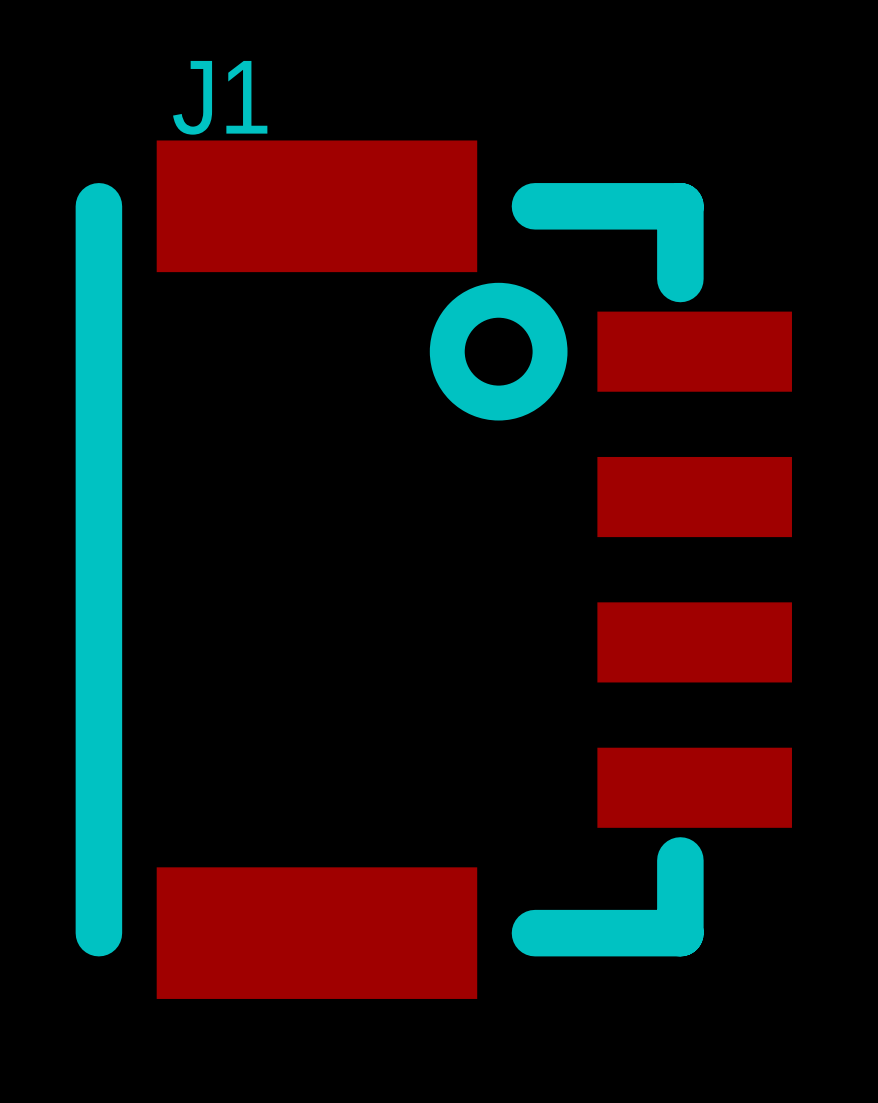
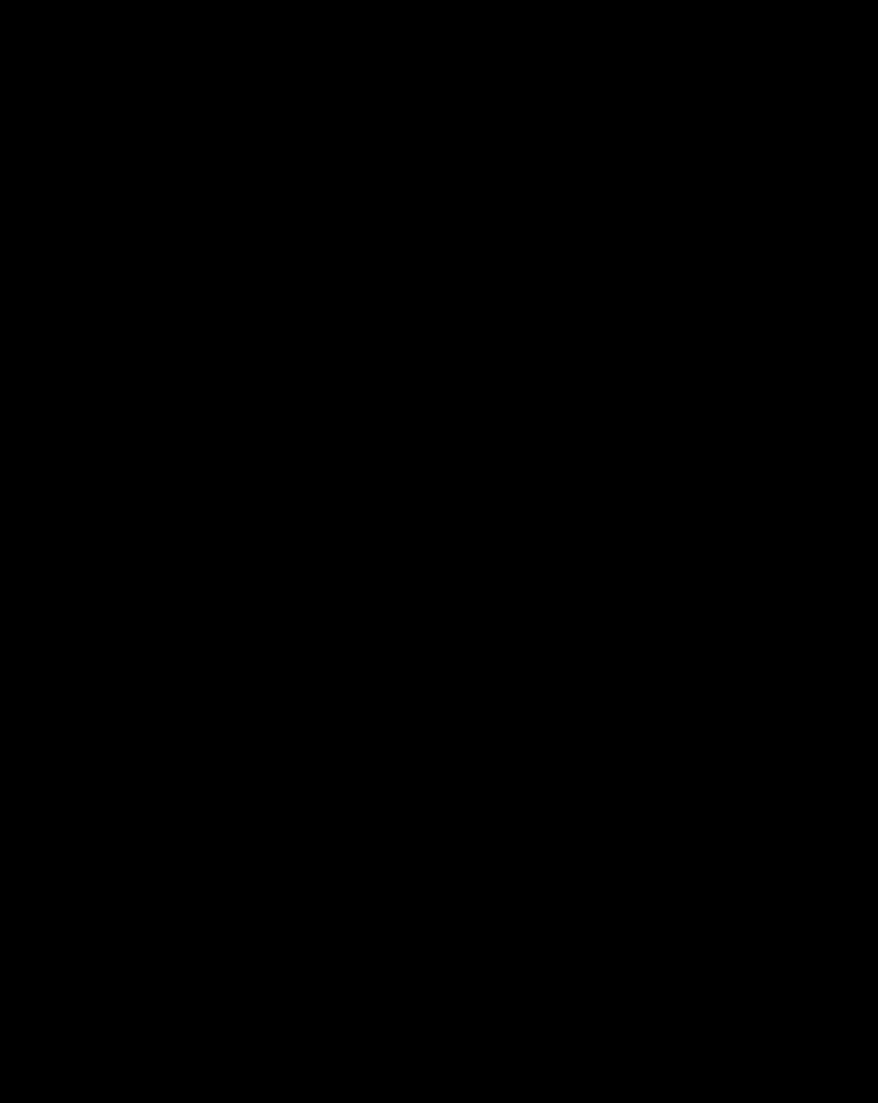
J1: (433, 569) -> none

